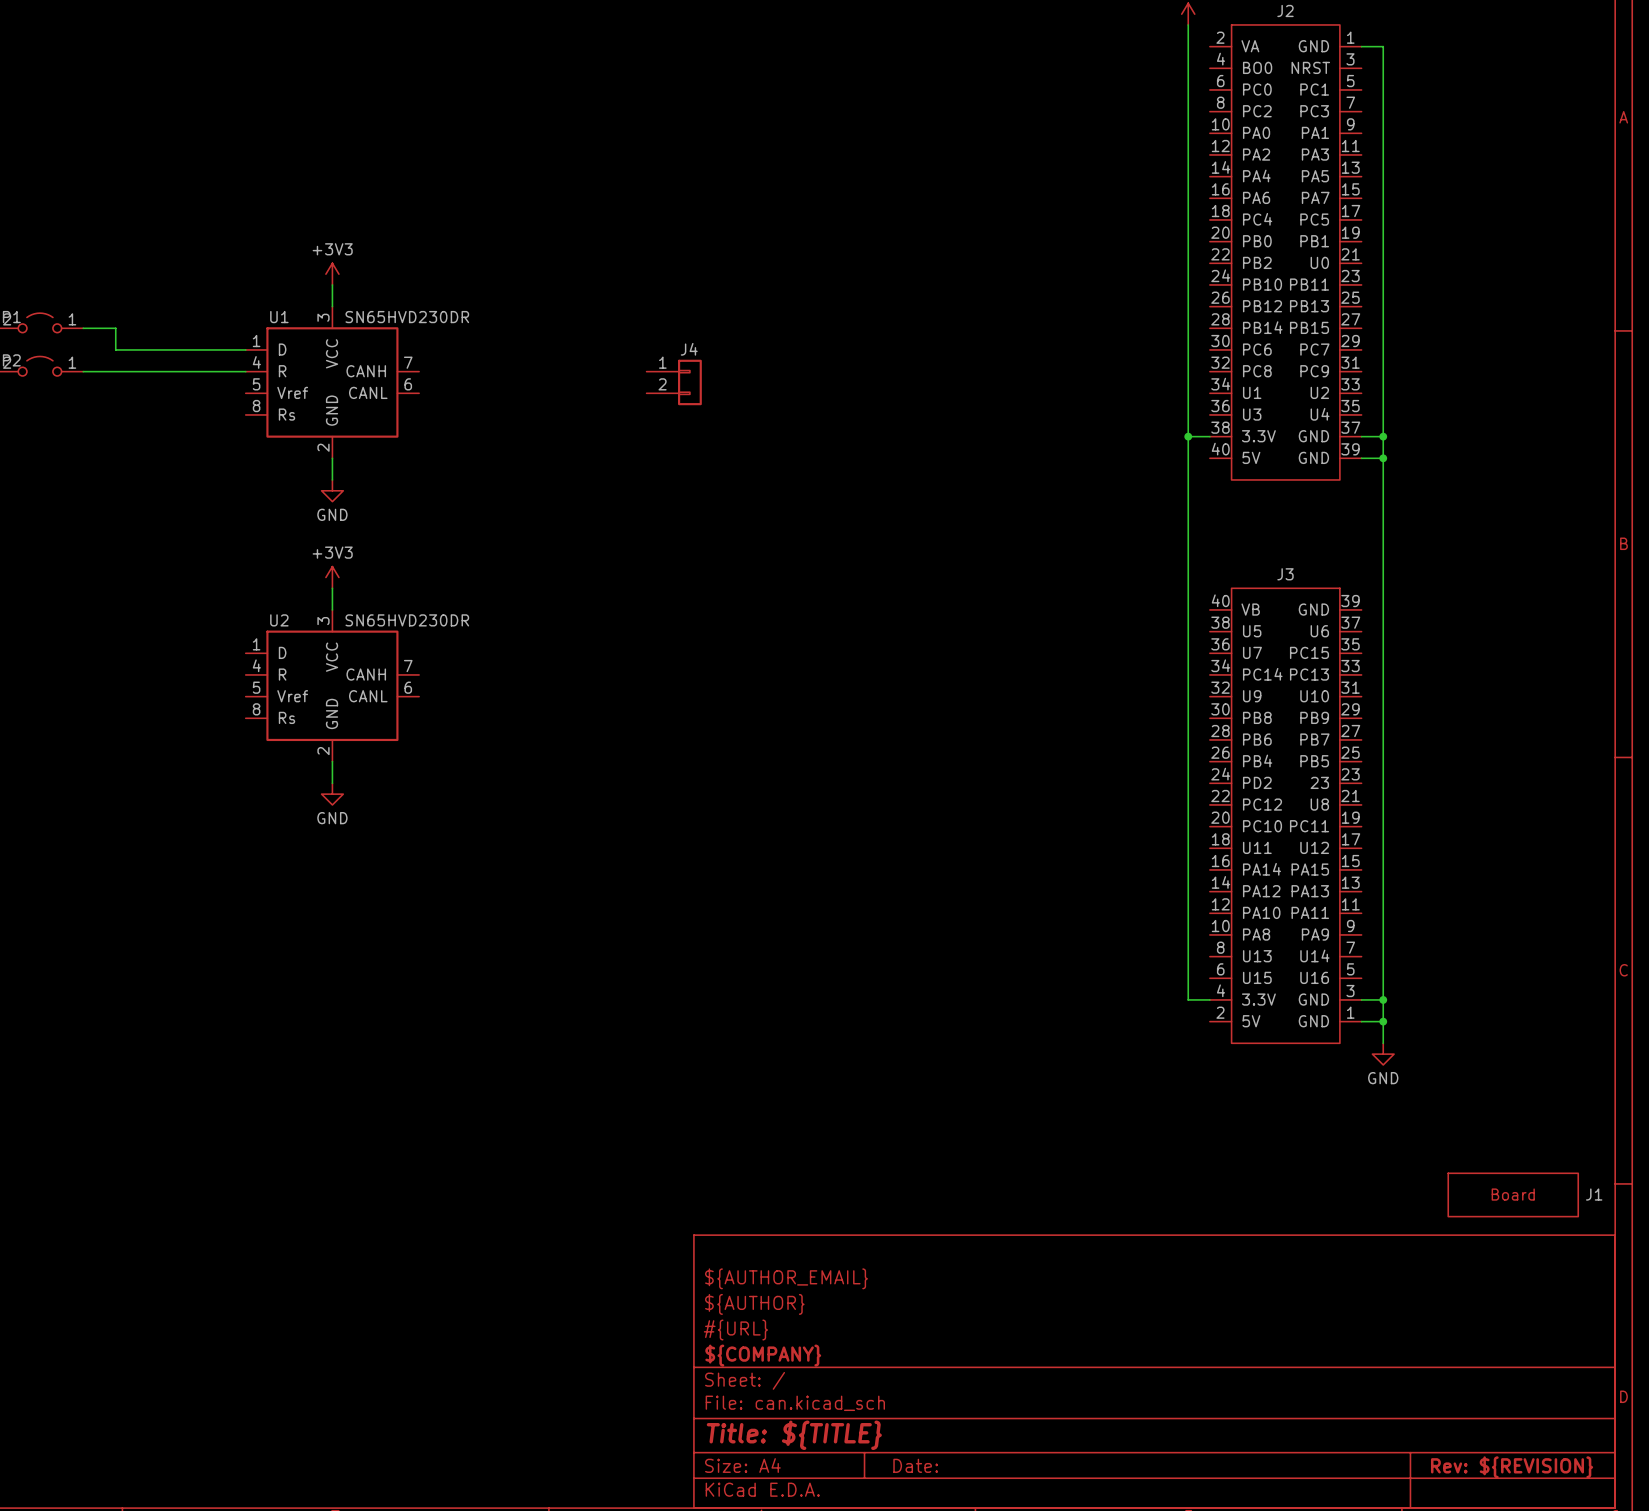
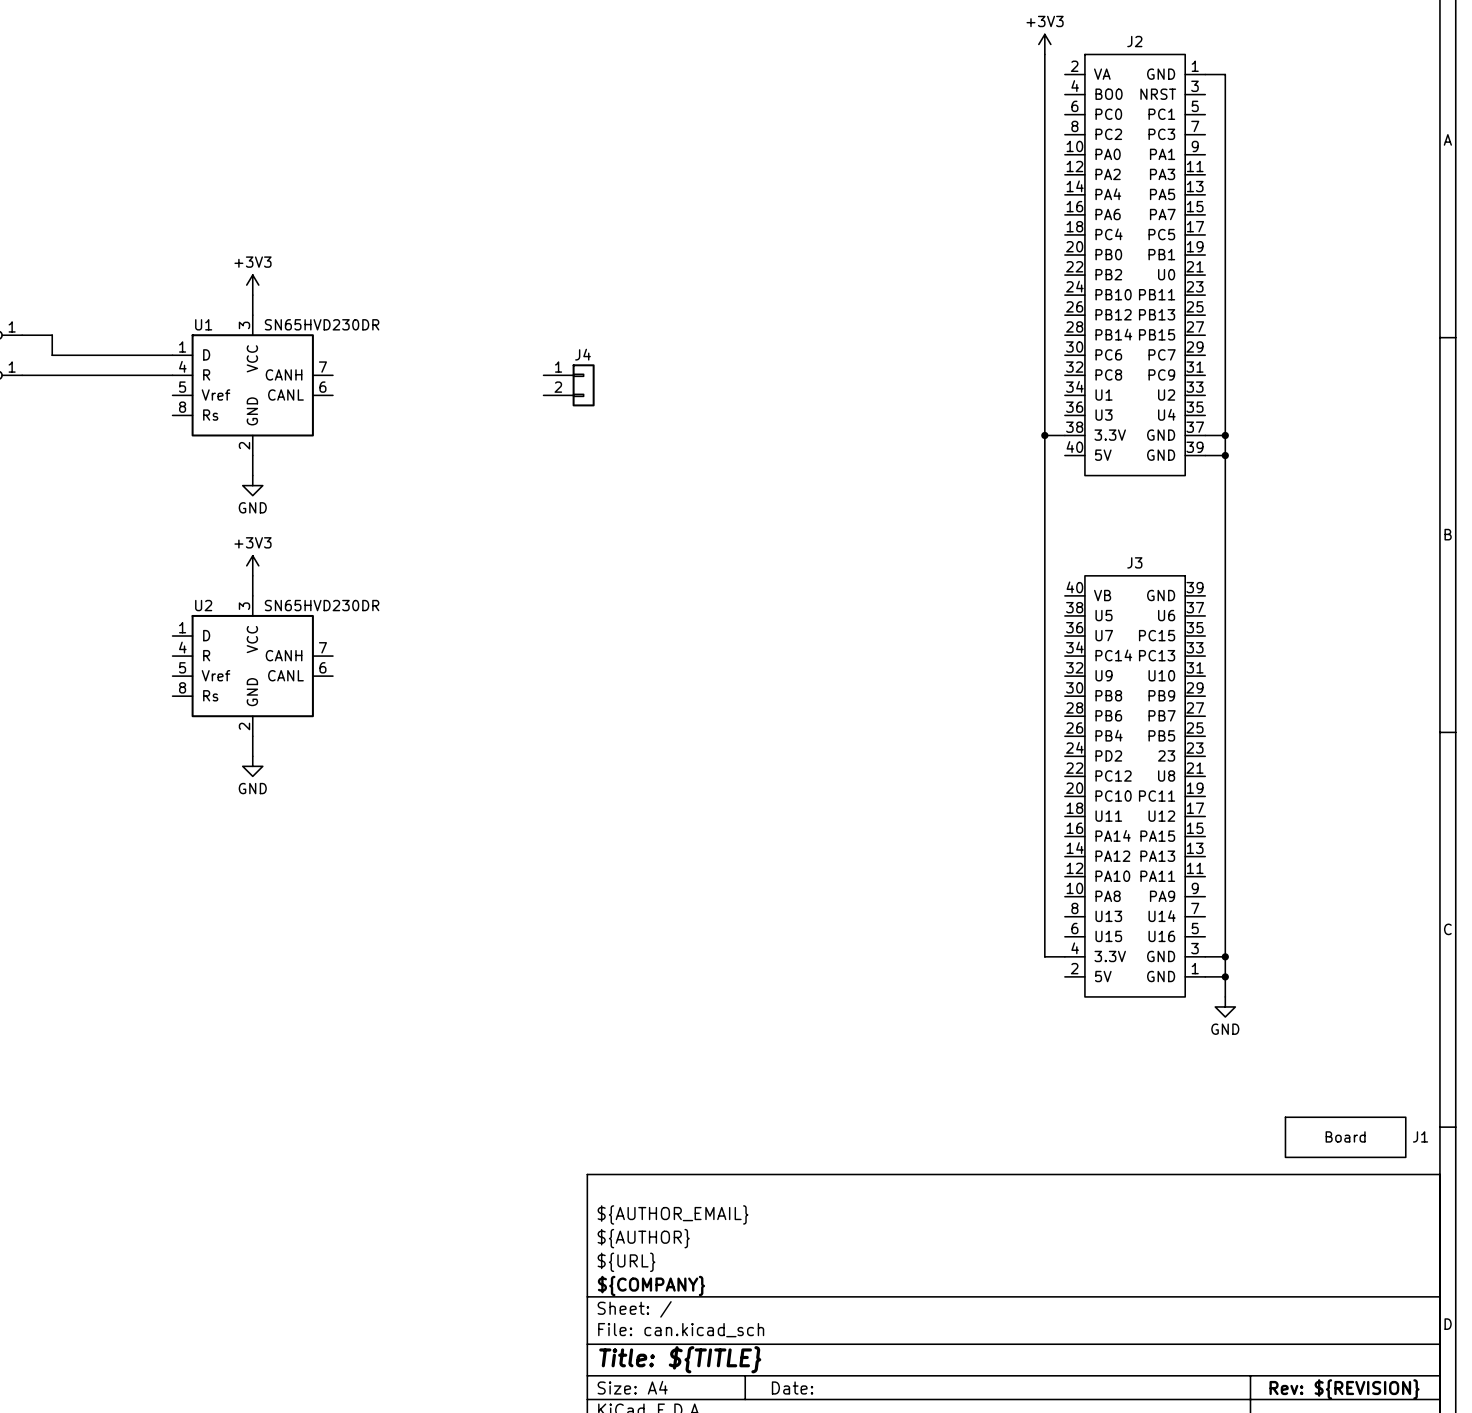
title block: #{URL} (735, 1330) -> ${URL} (626, 1262)

